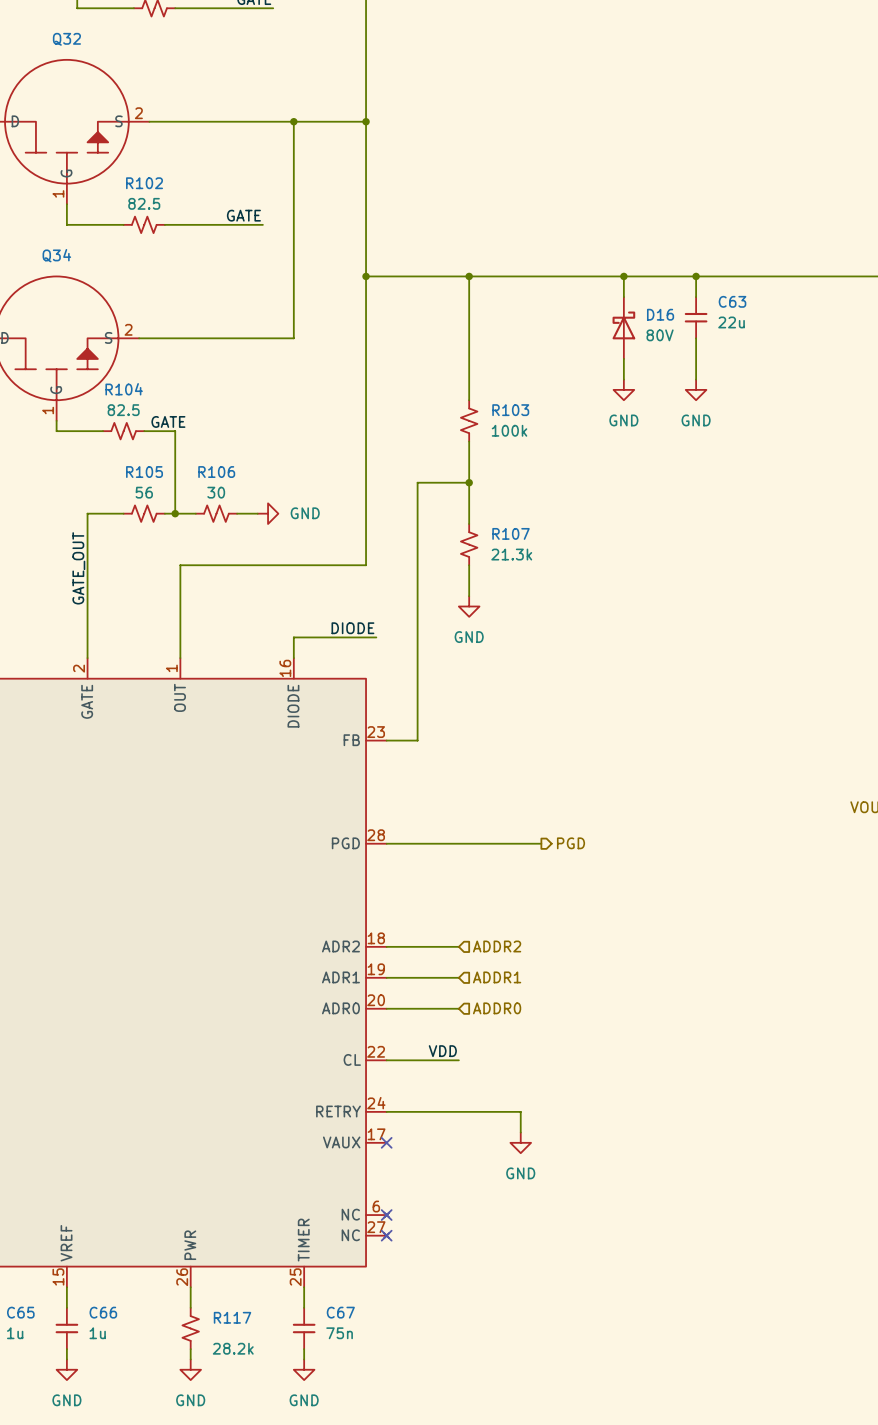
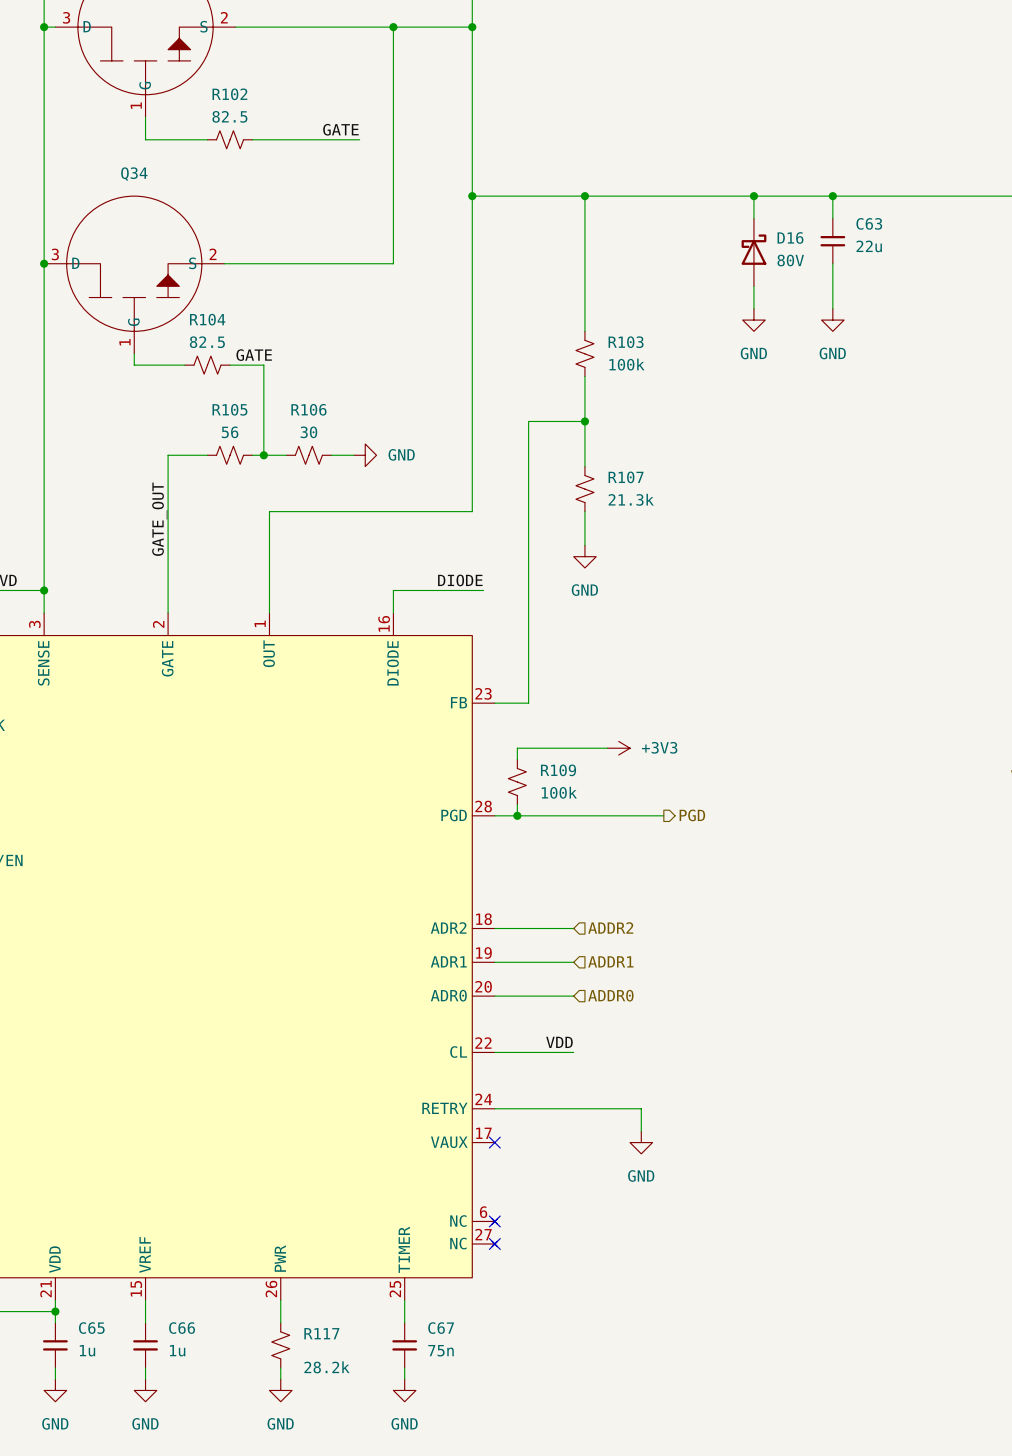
wire: none -> (607, 748) (517, 748) (517, 759)
power symbol: none -> +3V3 (618, 748)
R109: none -> 100k (517, 782)
wire: none -> (517, 804) (517, 815)
junction: none -> (517, 815)

